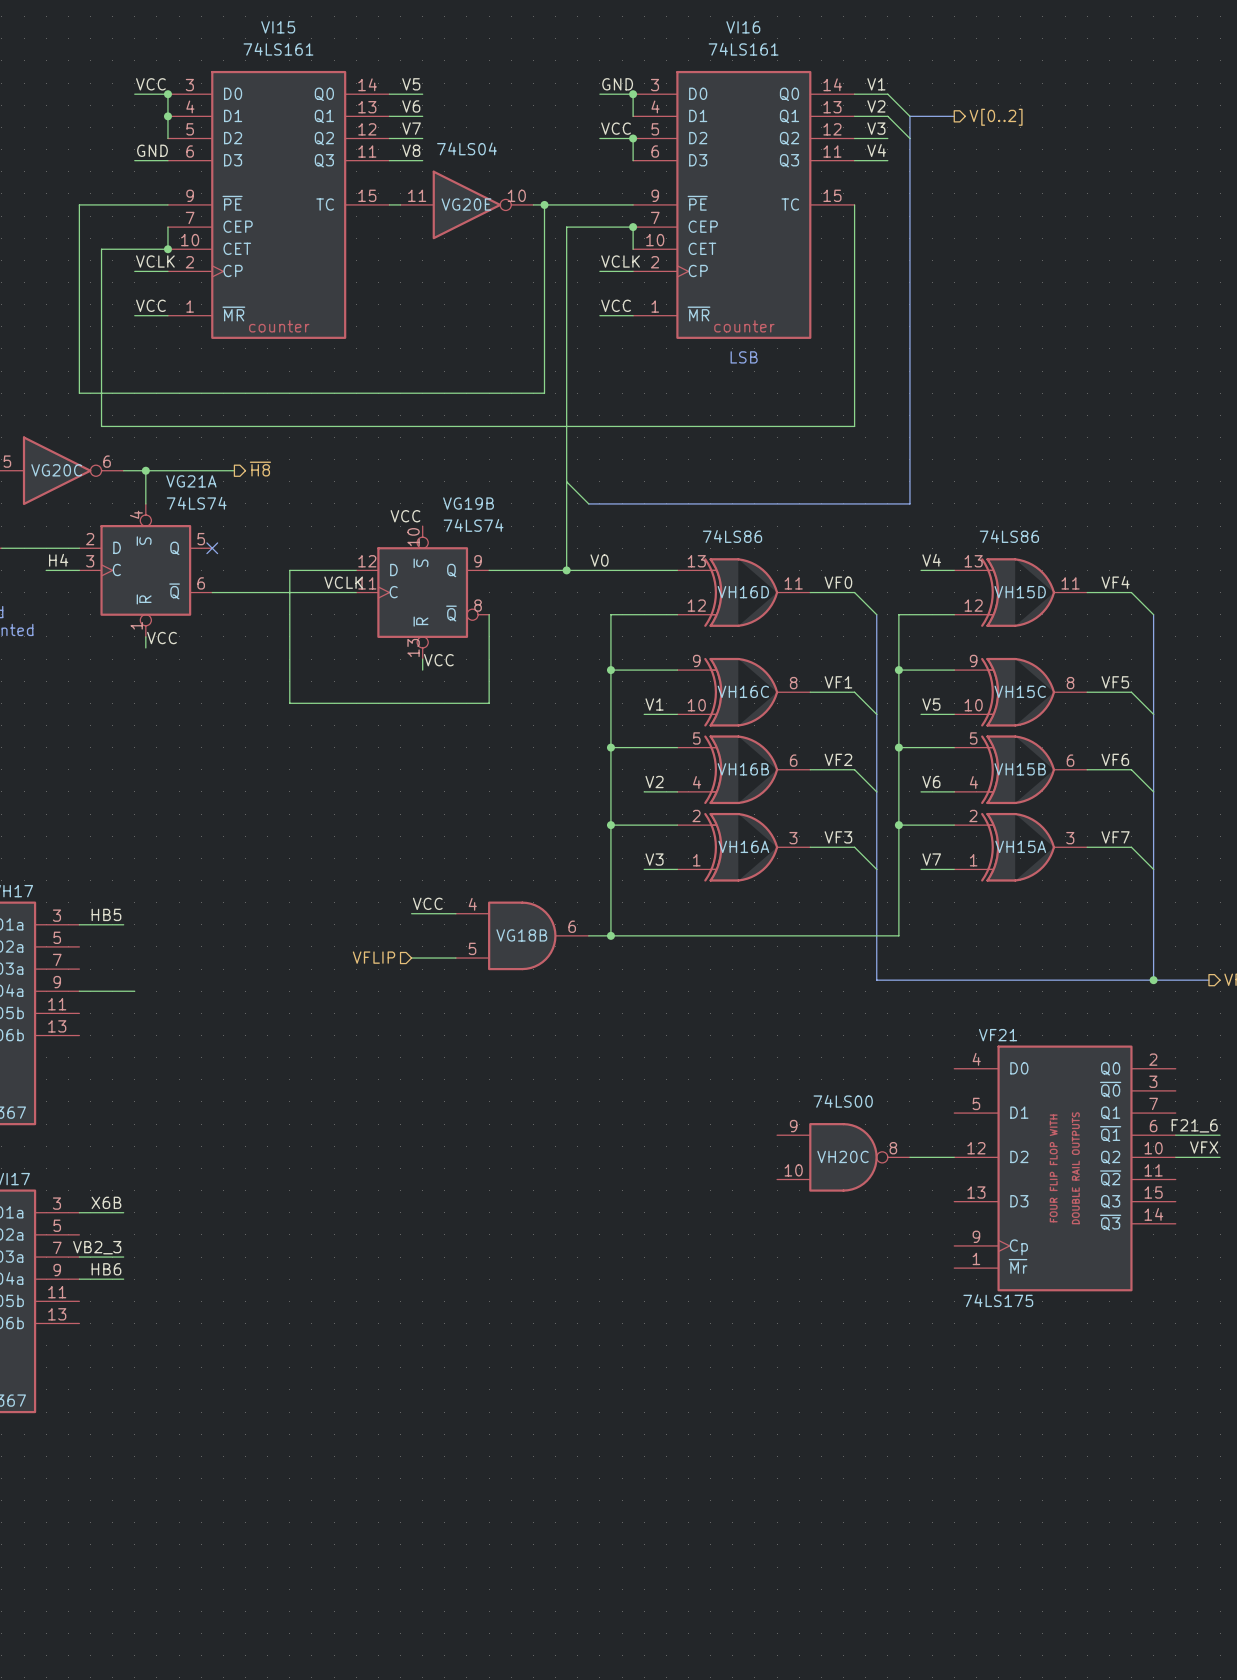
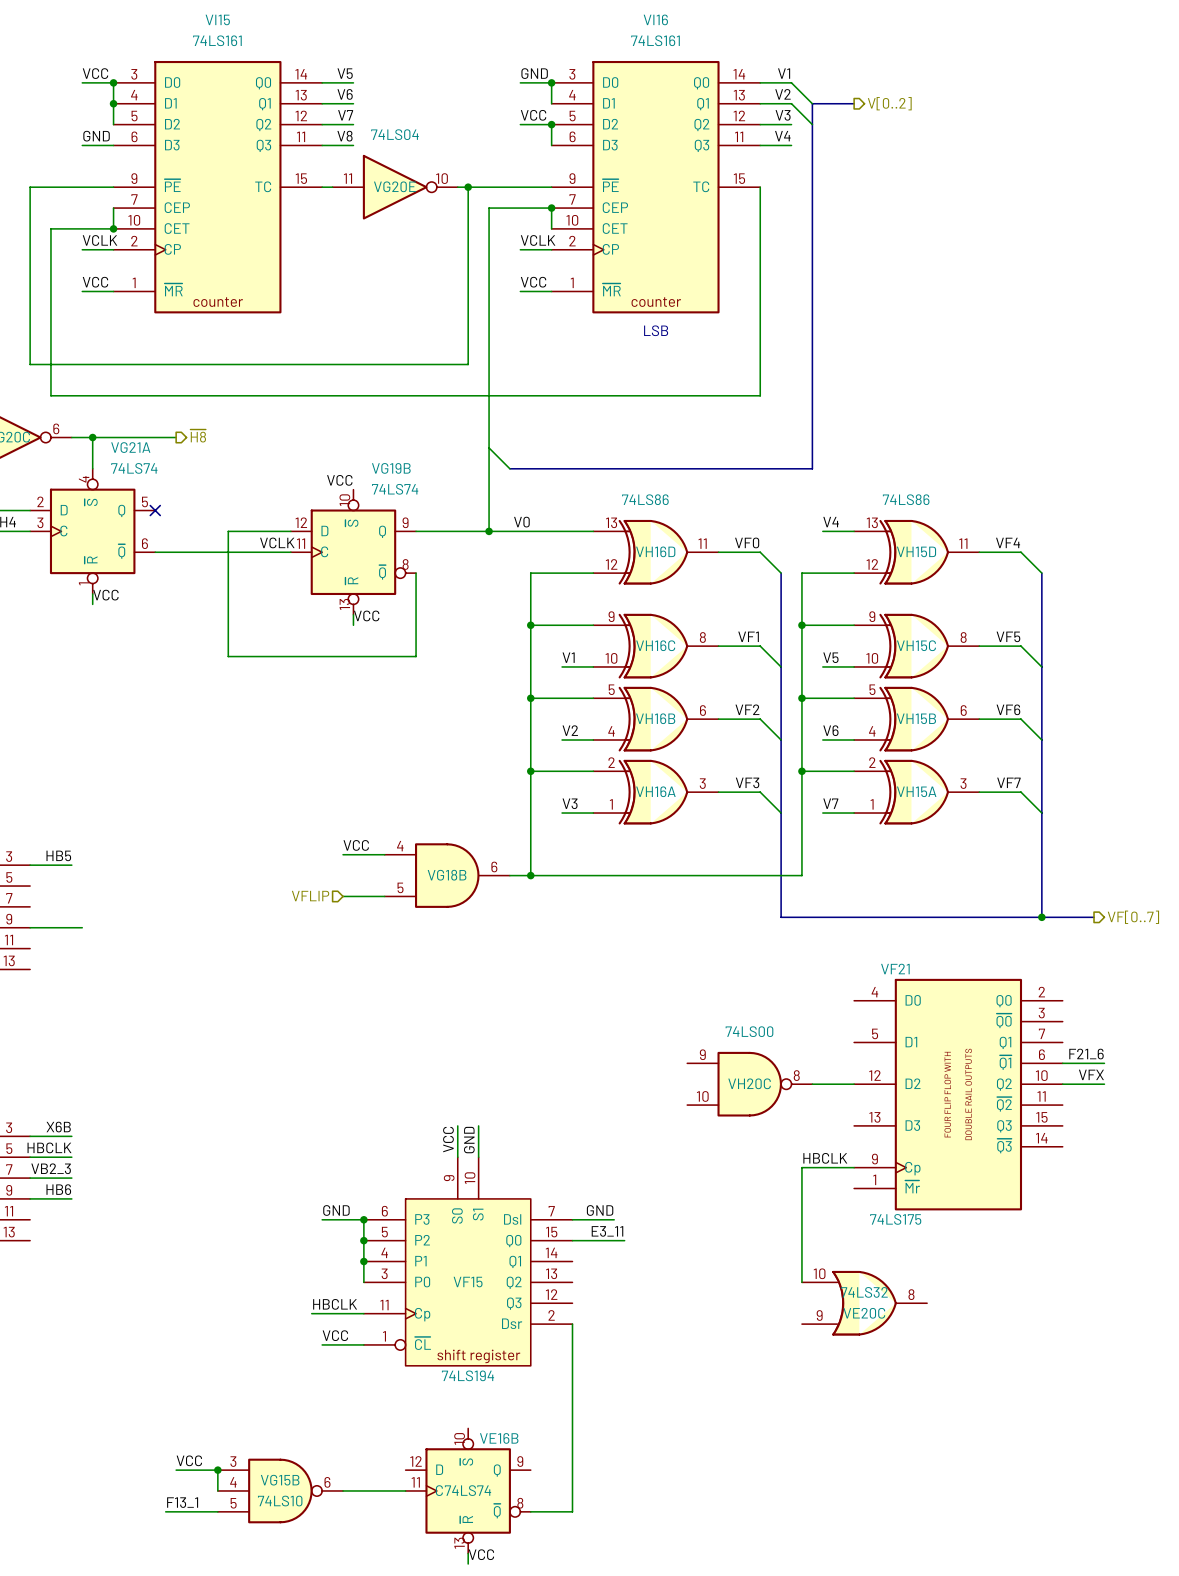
wire: none -> (457, 1125) (457, 1157)
wire: none -> (478, 1125) (478, 1157)
label: none -> VCC (448, 1139)
label: none -> GND (469, 1140)
label: none -> HBCLK (49, 1147)
wire: none -> (30, 1157) (71, 1157)
label: none -> HBCLK (825, 1158)
wire: none -> (854, 1167) (801, 1167) (801, 1282)
label: none -> GND (336, 1210)
label: none -> GND (600, 1210)
wire: none -> (322, 1219) (363, 1219) (363, 1282)
junction: none -> (363, 1219)
wire: none -> (572, 1219) (614, 1219)
label: none -> E3_11 (607, 1231)
junction: none -> (363, 1240)
wire: none -> (572, 1240) (624, 1240)
junction: none -> (363, 1261)
VF15: none -> 74LS194 (468, 1261)
VE20C: none -> 74LS32 (864, 1303)
label: none -> HBCLK (335, 1304)
wire: none -> (311, 1313) (363, 1313)
wire: none -> (572, 1324) (572, 1511) (530, 1511)
label: none -> VCC (335, 1335)
wire: none -> (322, 1344) (363, 1344)
label: none -> VCC (189, 1460)
wire: none -> (176, 1470) (217, 1470) (217, 1490)
junction: none -> (217, 1470)
VG15B: none -> 74LS10 (280, 1490)
wire: none -> (343, 1490) (405, 1490)
VE16B: none -> 74LS74 (468, 1490)
label: none -> F13_1 (182, 1502)
wire: none -> (165, 1511) (217, 1511)
wire: none -> (468, 1553) (468, 1564)
label: none -> VCC (481, 1554)

